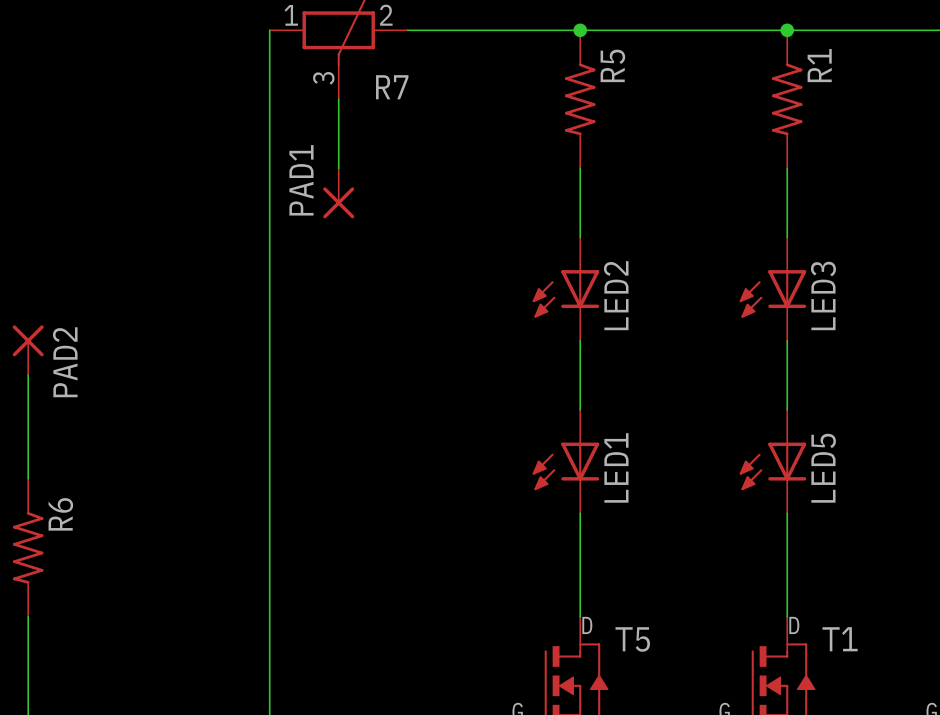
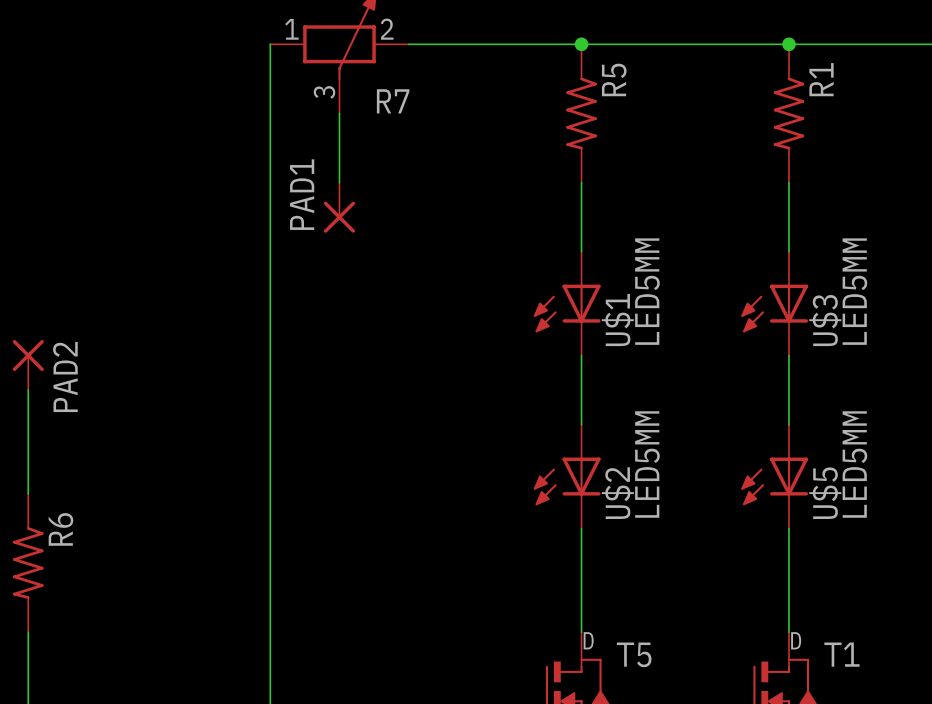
LED2 value: none -> LED5MM (647, 291)
LED3 value: none -> LED5MM (854, 291)
LED2 name: LED2 (616, 295) -> U$1 (617, 320)
LED3 name: LED3 (823, 295) -> U$3 (825, 320)
LED1 value: none -> LED5MM (647, 464)
LED5 value: none -> LED5MM (854, 464)
LED1 name: LED1 (616, 467) -> U$2 (617, 493)
LED5 name: LED5 (823, 468) -> U$5 (825, 493)

